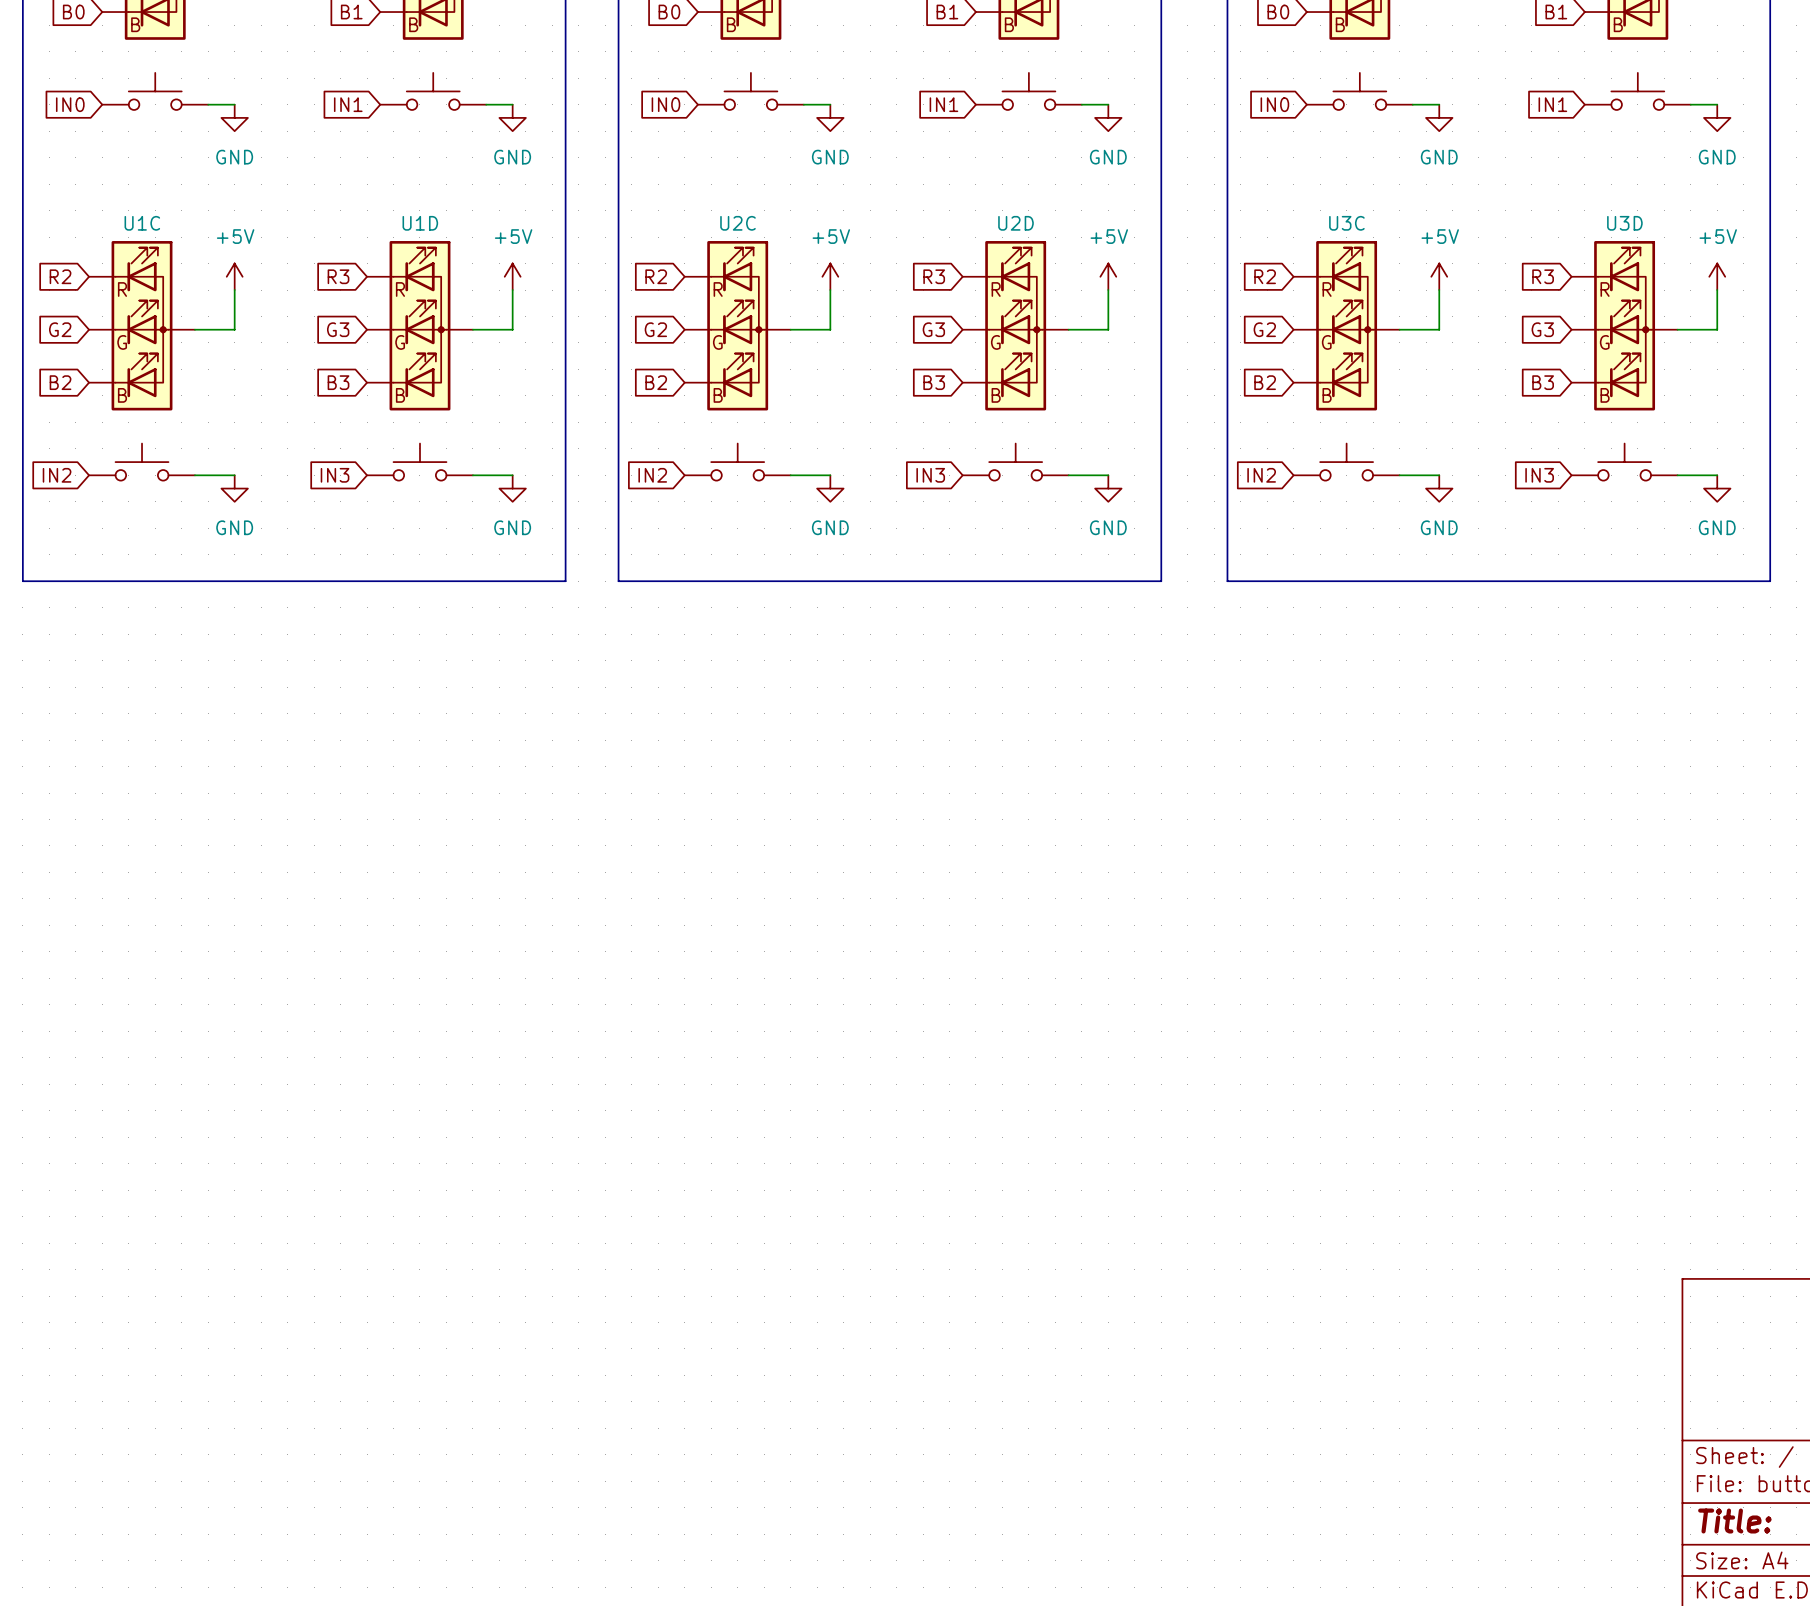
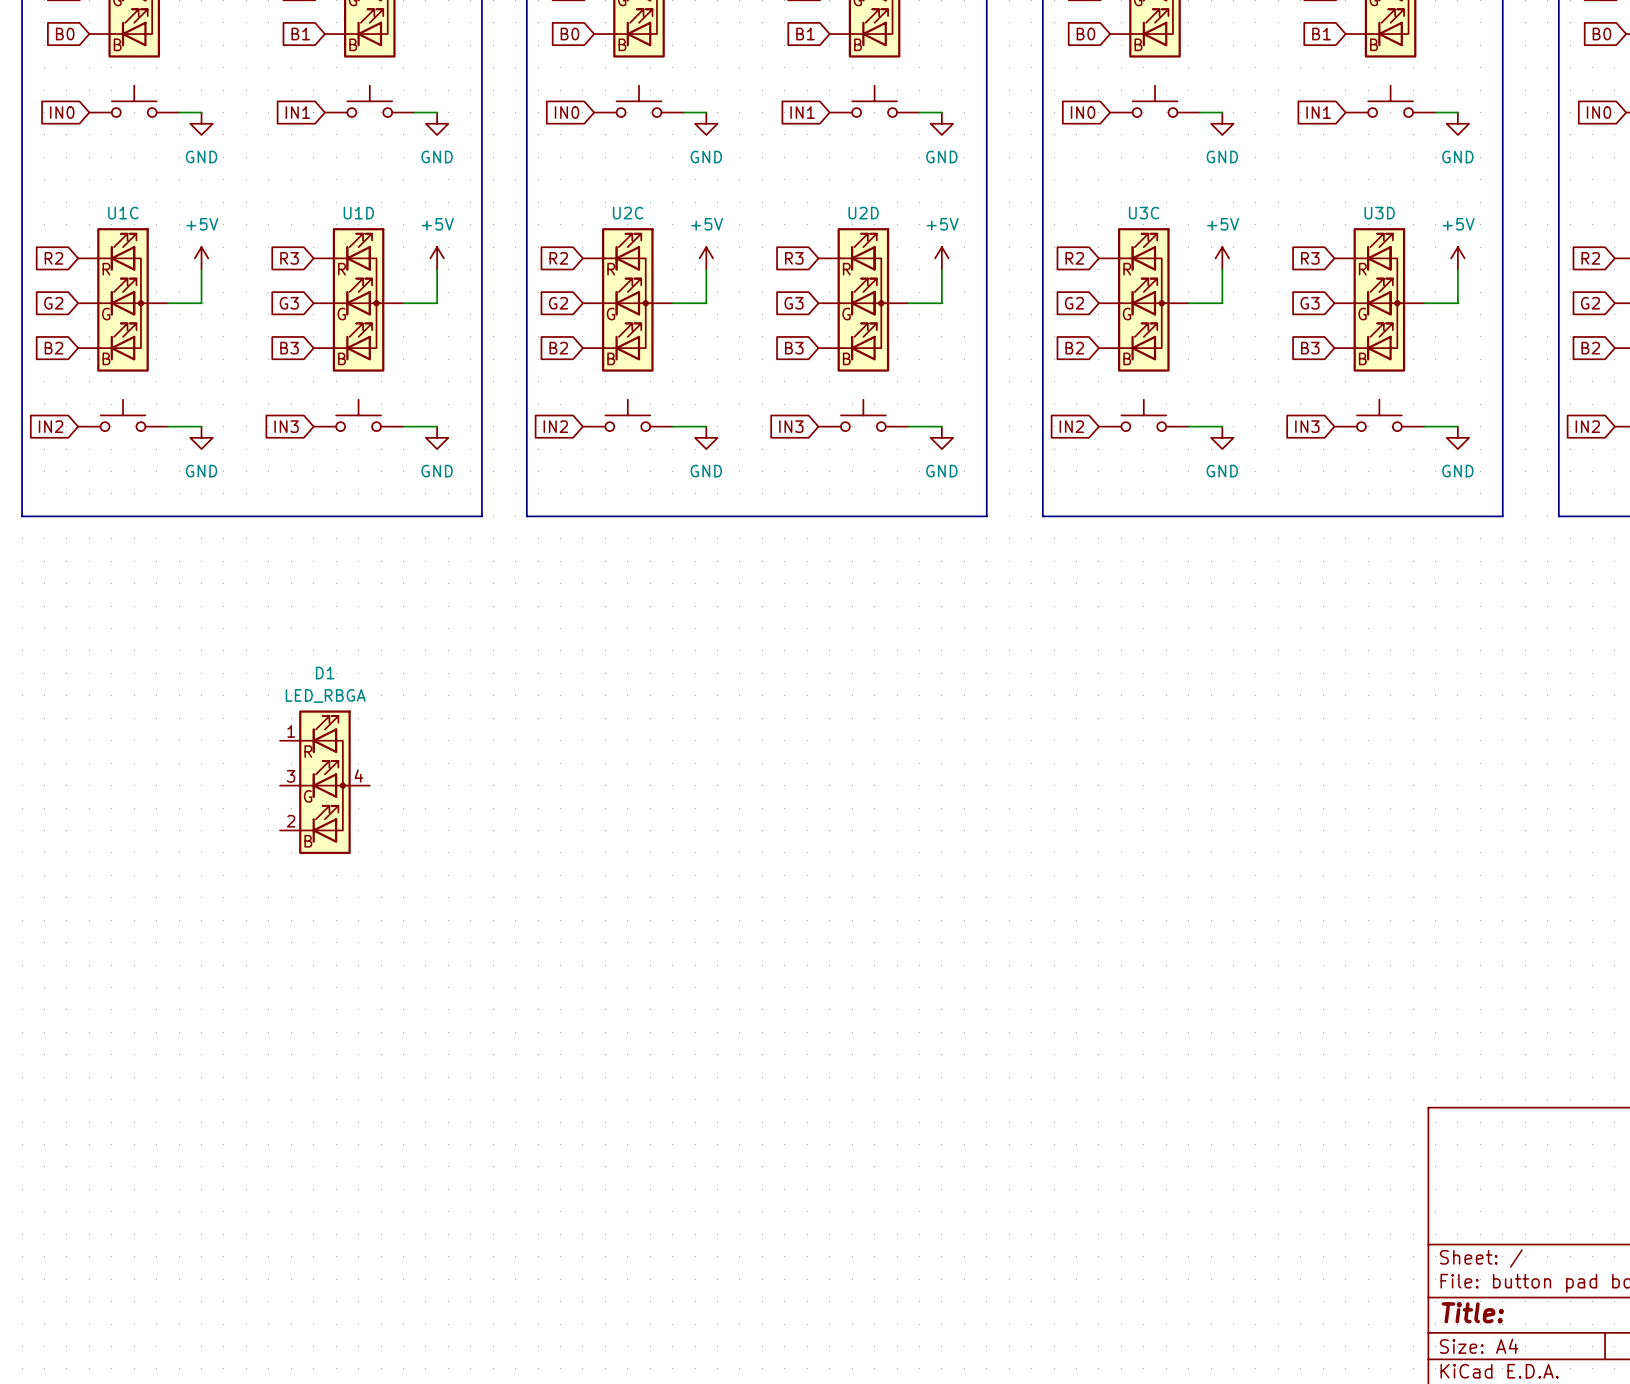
D1: none -> LED_RBGA (324, 782)

